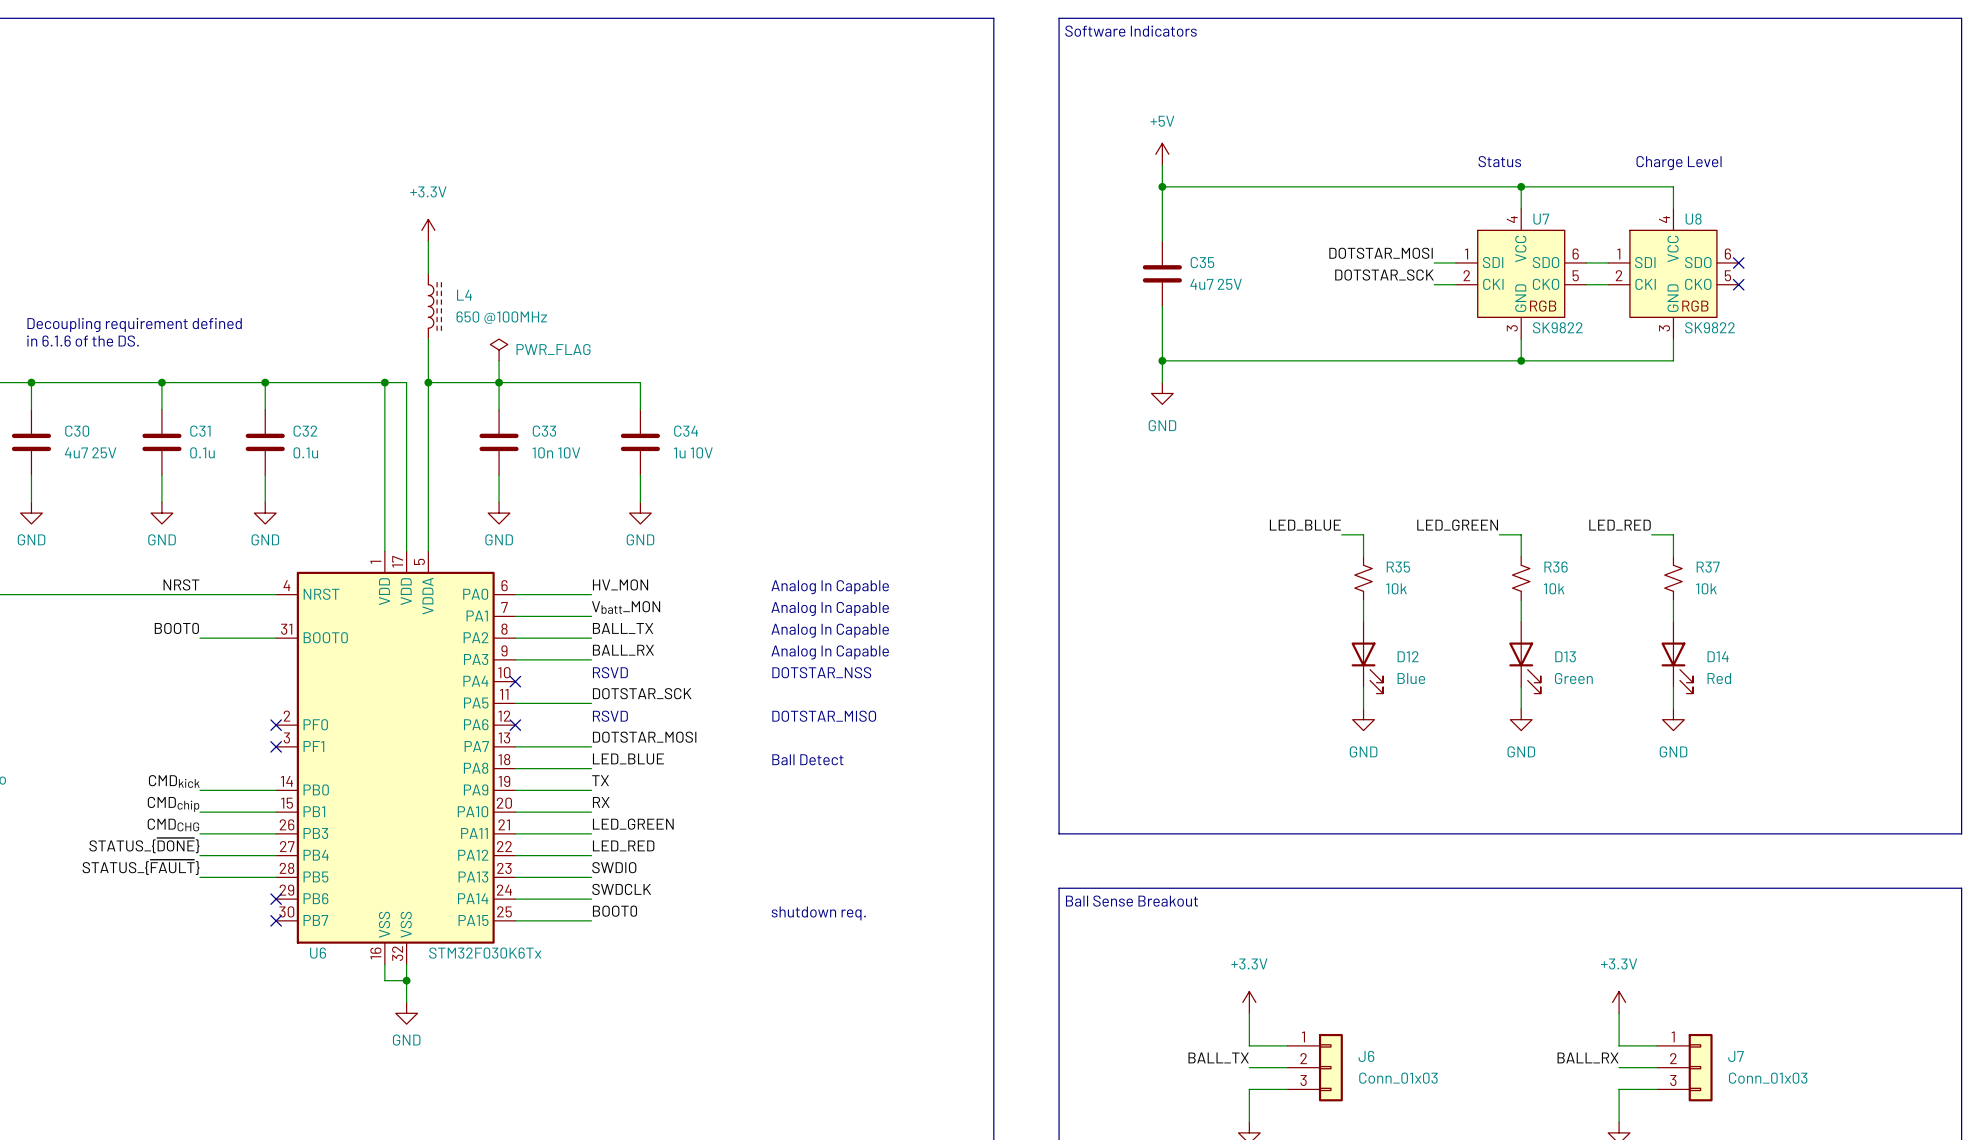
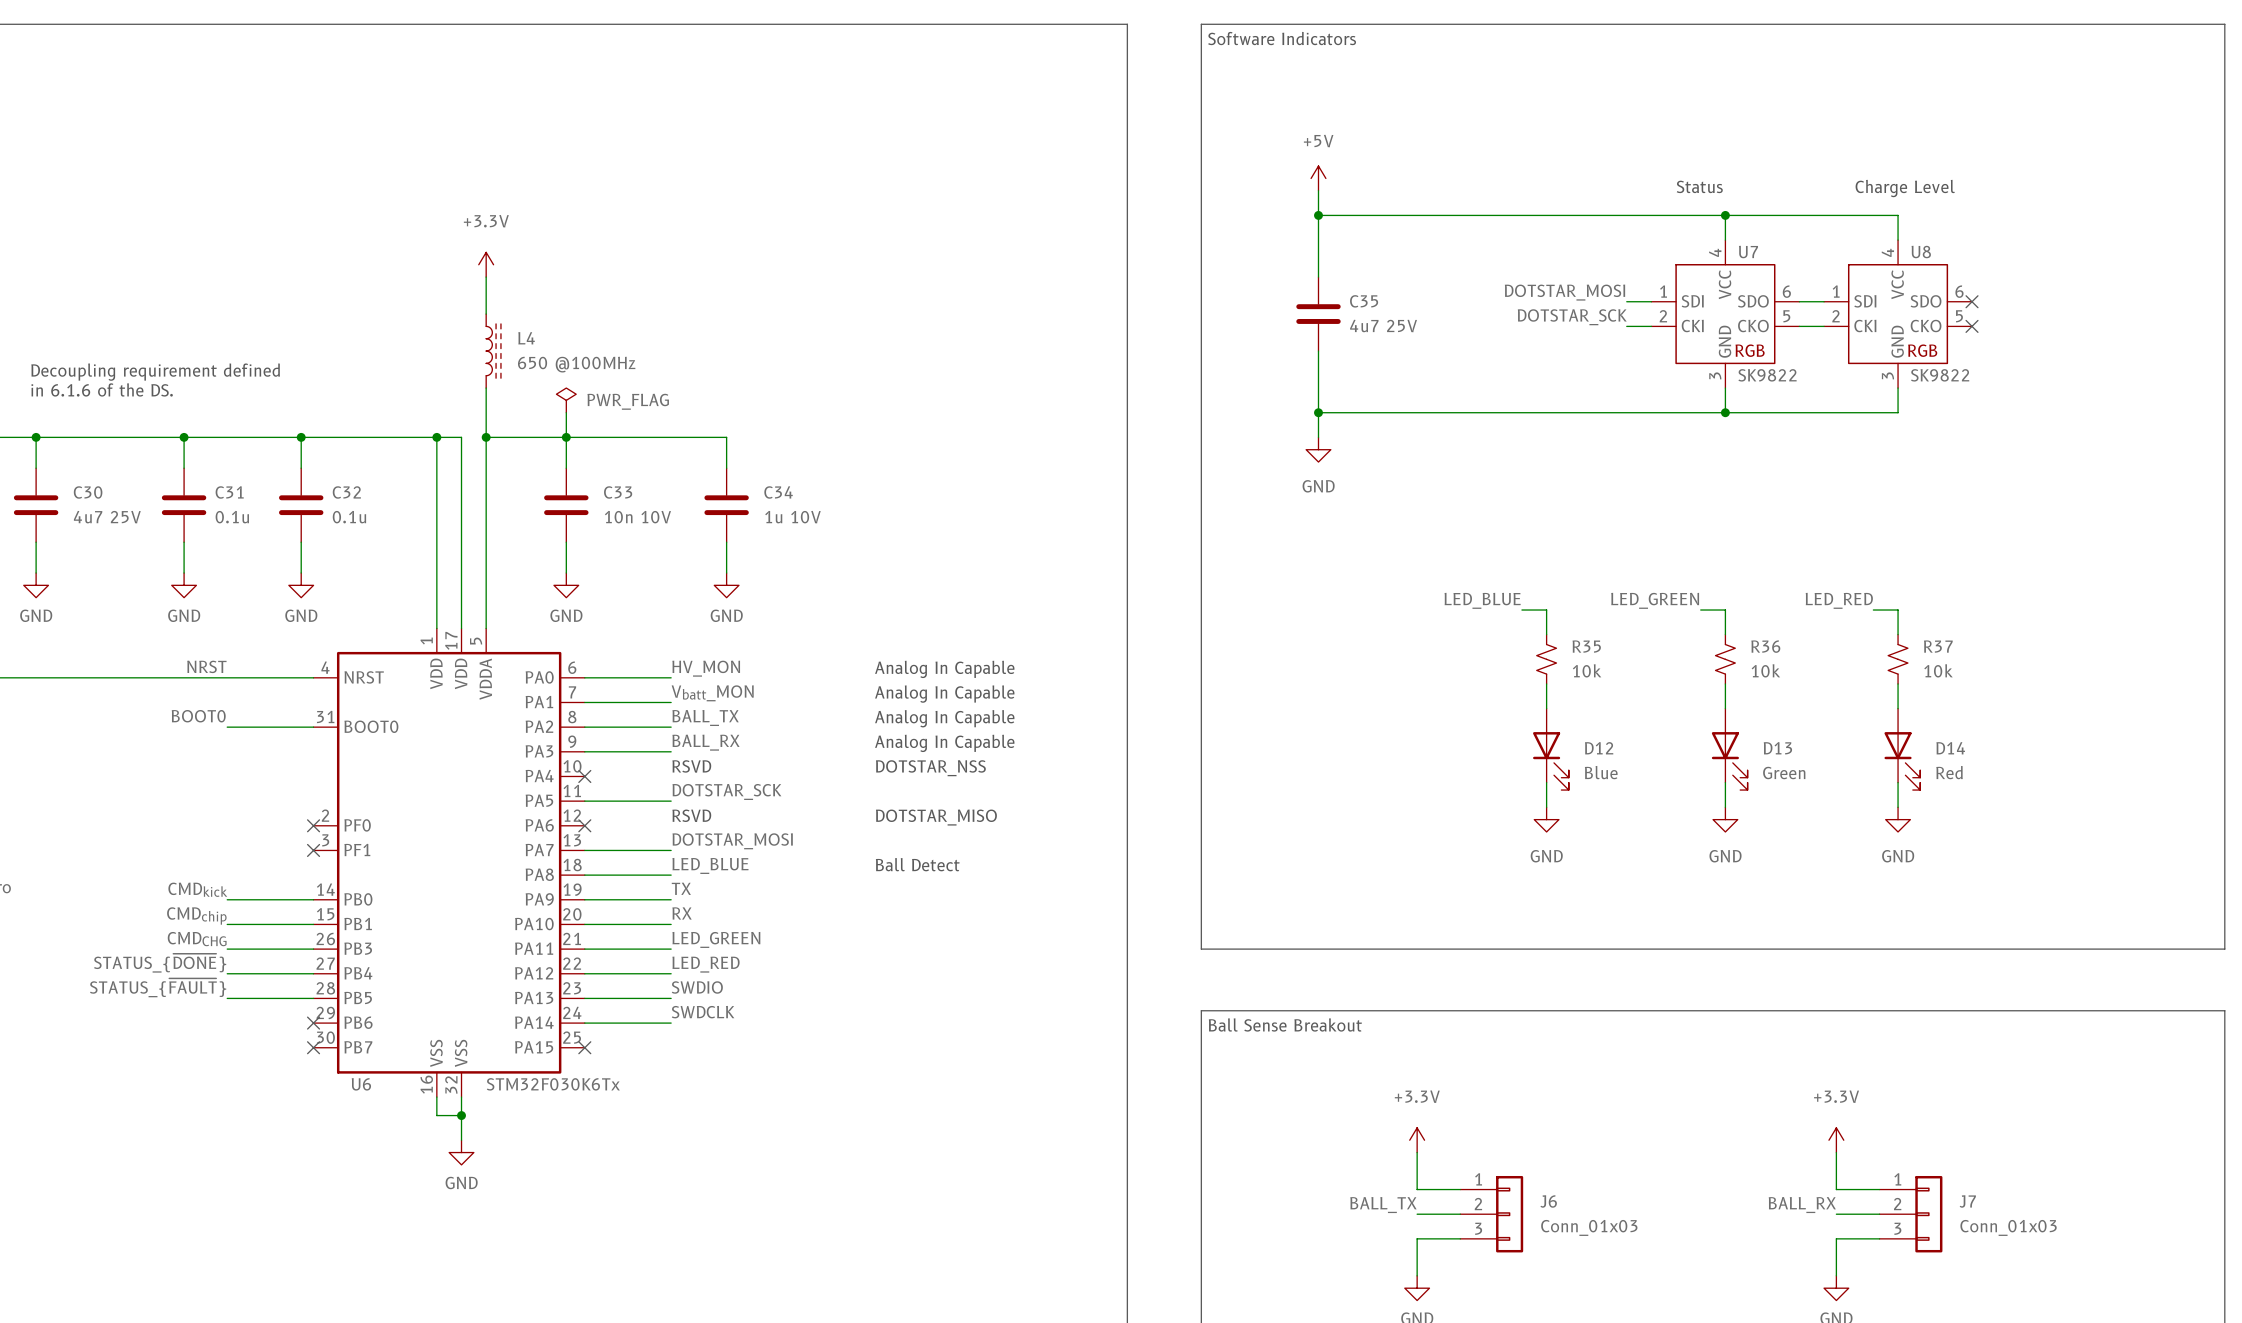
label: BOOT0 (614, 911) -> none
text: shutdown req. (818, 913) -> none
wire: (515, 920) (591, 920) -> none
no-connect mark: none -> (584, 1047)

